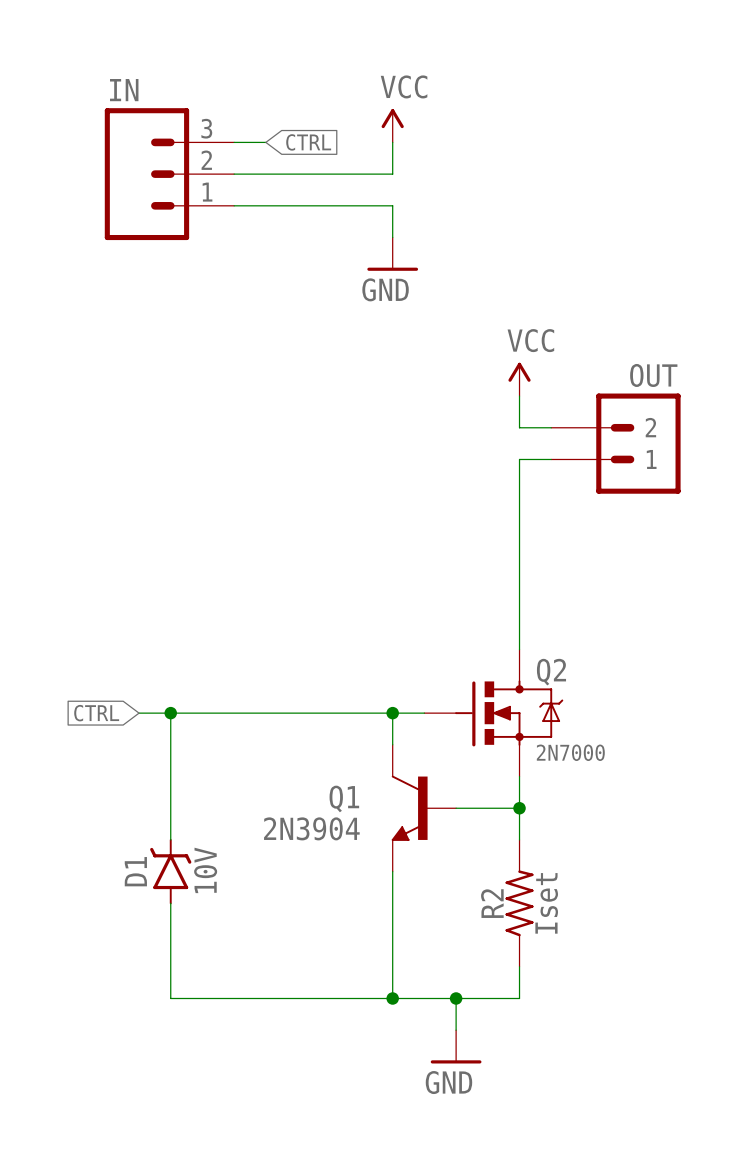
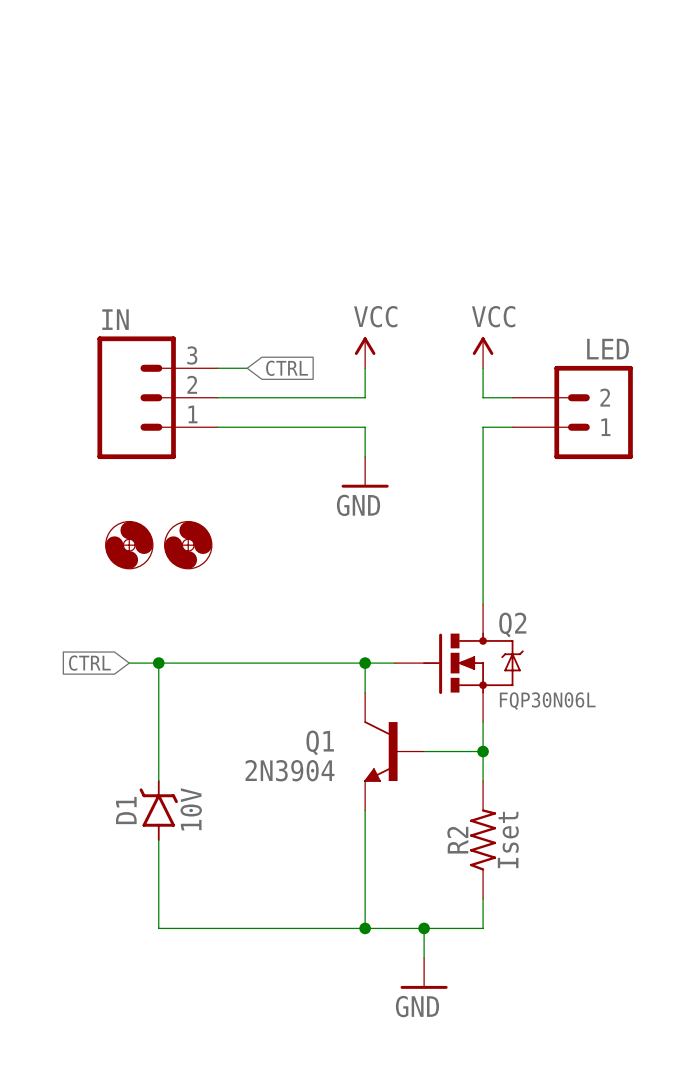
power symbol position: VCC (392, 125) -> VCC (365, 352)
wire: (234, 142) (265, 142) -> (217, 368) (247, 368)
global label position: CTRL (308, 142) -> CTRL (287, 368)
wire: (392, 142) (392, 174) (234, 174) -> (365, 368) (365, 397) (217, 397)
IN position: (169, 174) -> (157, 397)
wire: (234, 205) (392, 205) (392, 237) -> (217, 427) (365, 427) (365, 456)
power symbol position: GND (392, 254) -> GND (365, 472)
OUT name: OUT (653, 375) -> LED (608, 349)
part: none -> (129, 545)
part: none -> (188, 545)
Q2 value: 2N7000 (570, 752) -> FQP30N06L (547, 701)

